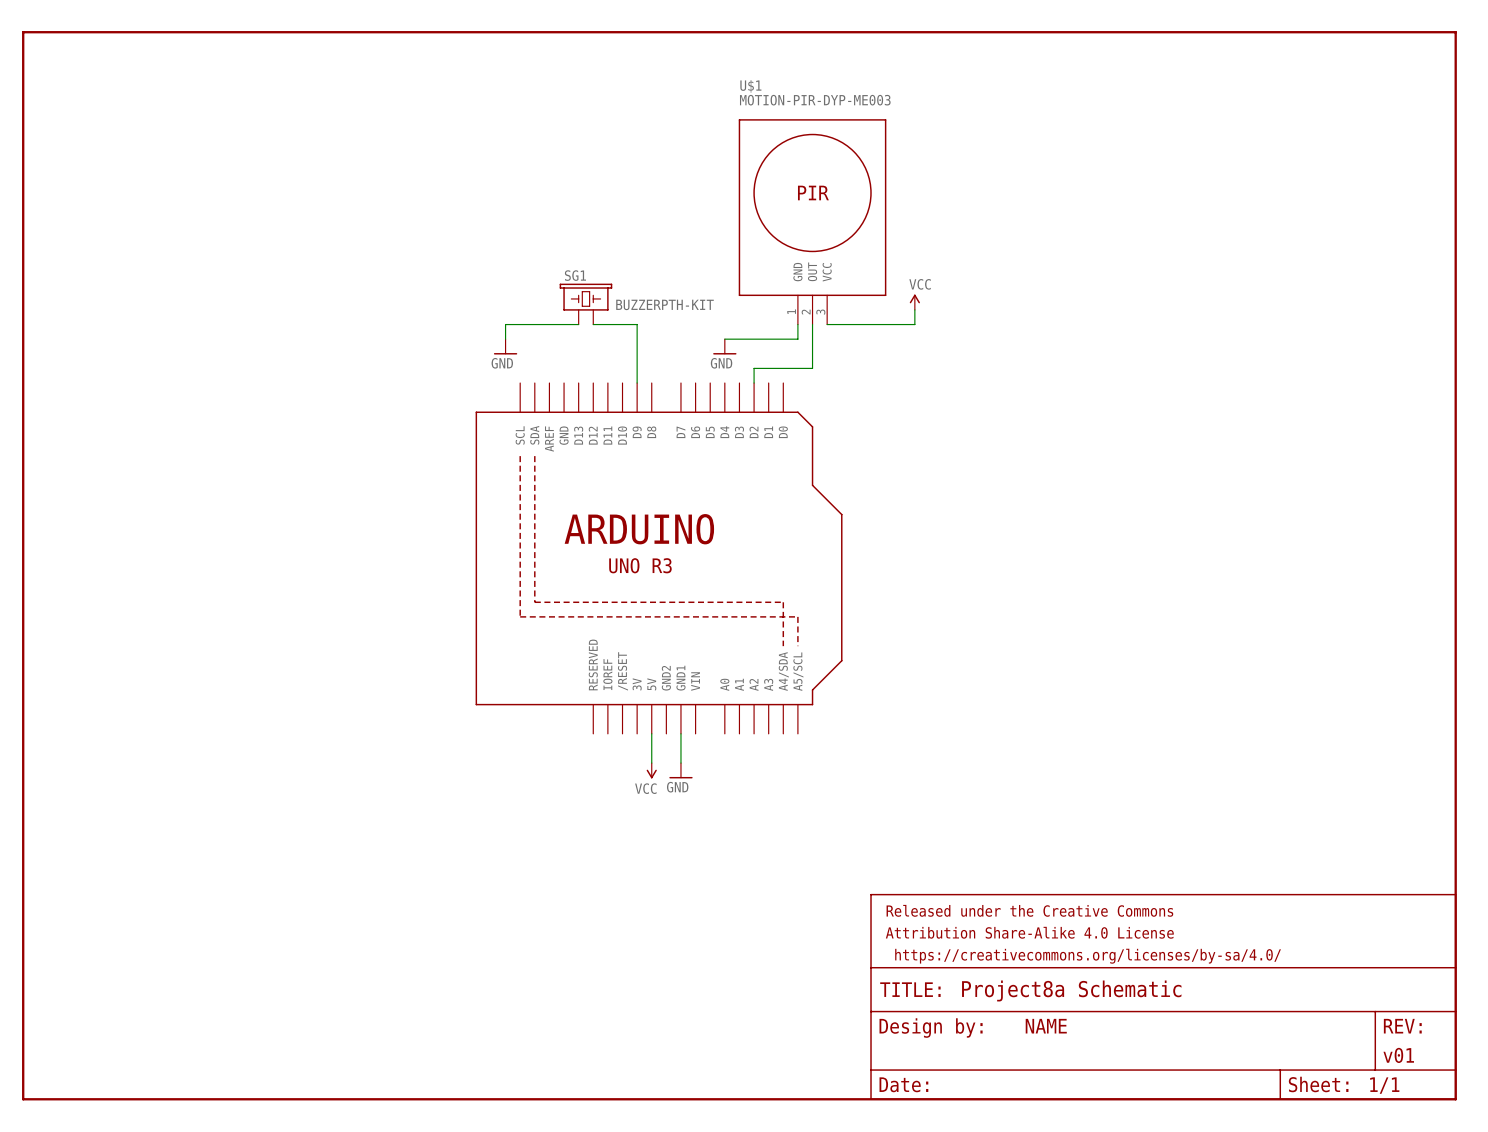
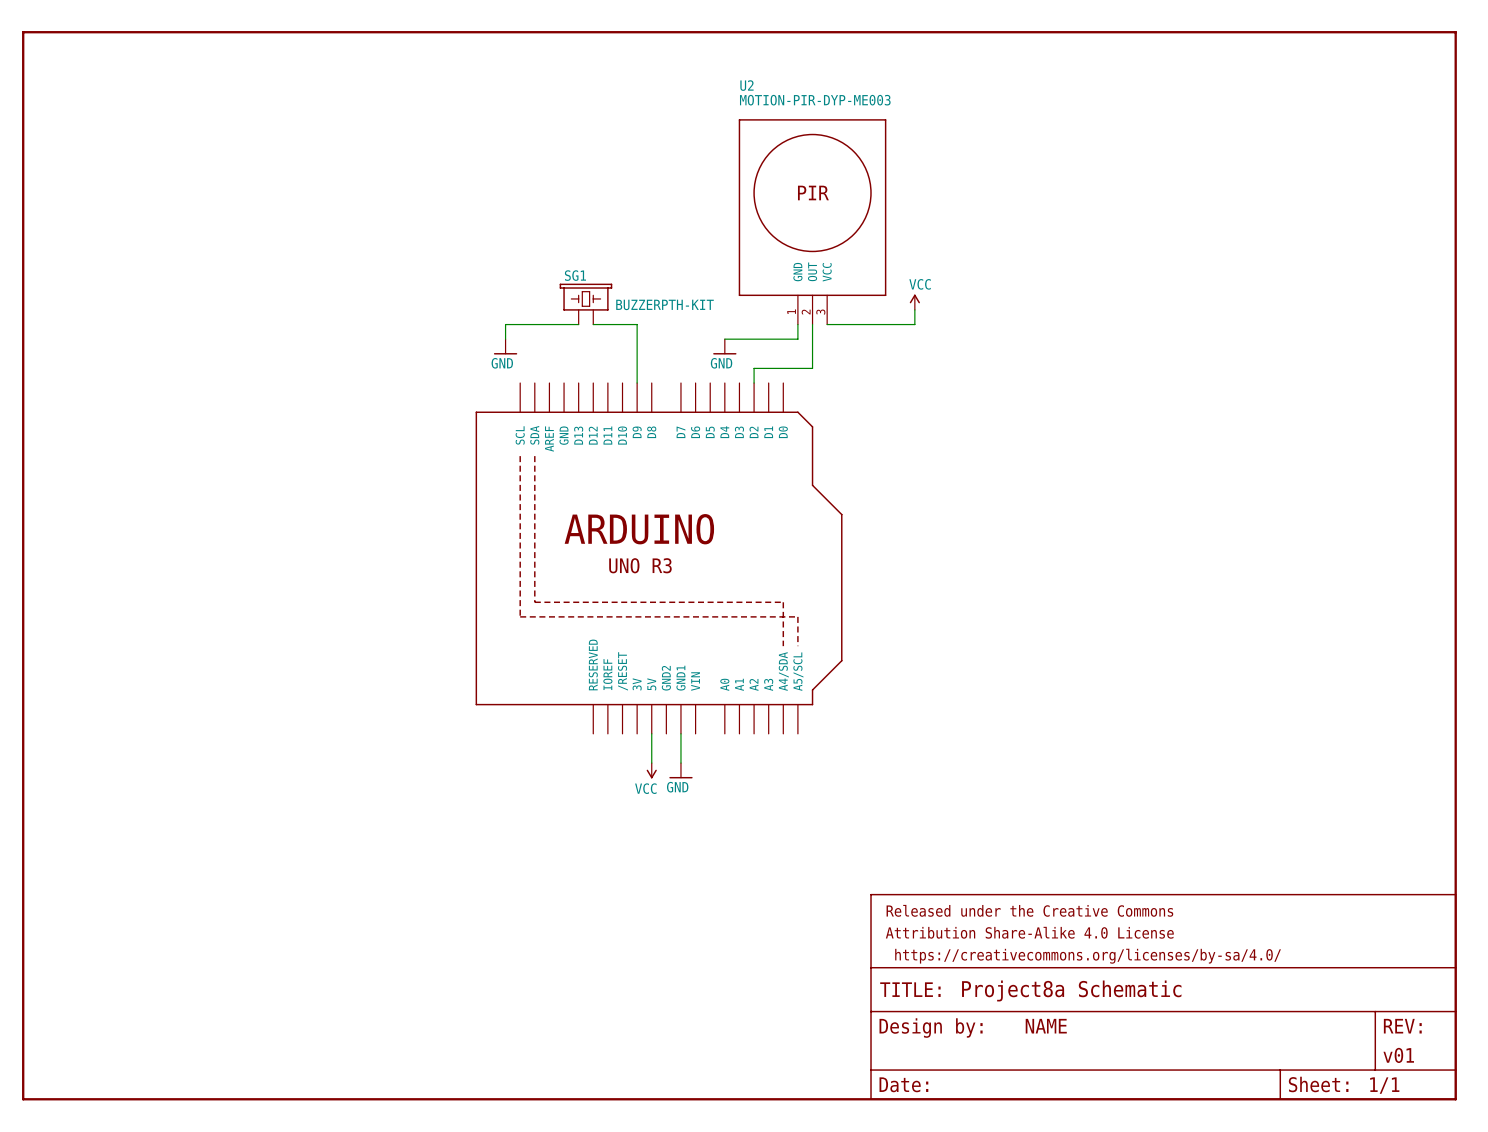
U$1 name: U$1 (750, 86) -> U2 (746, 85)

